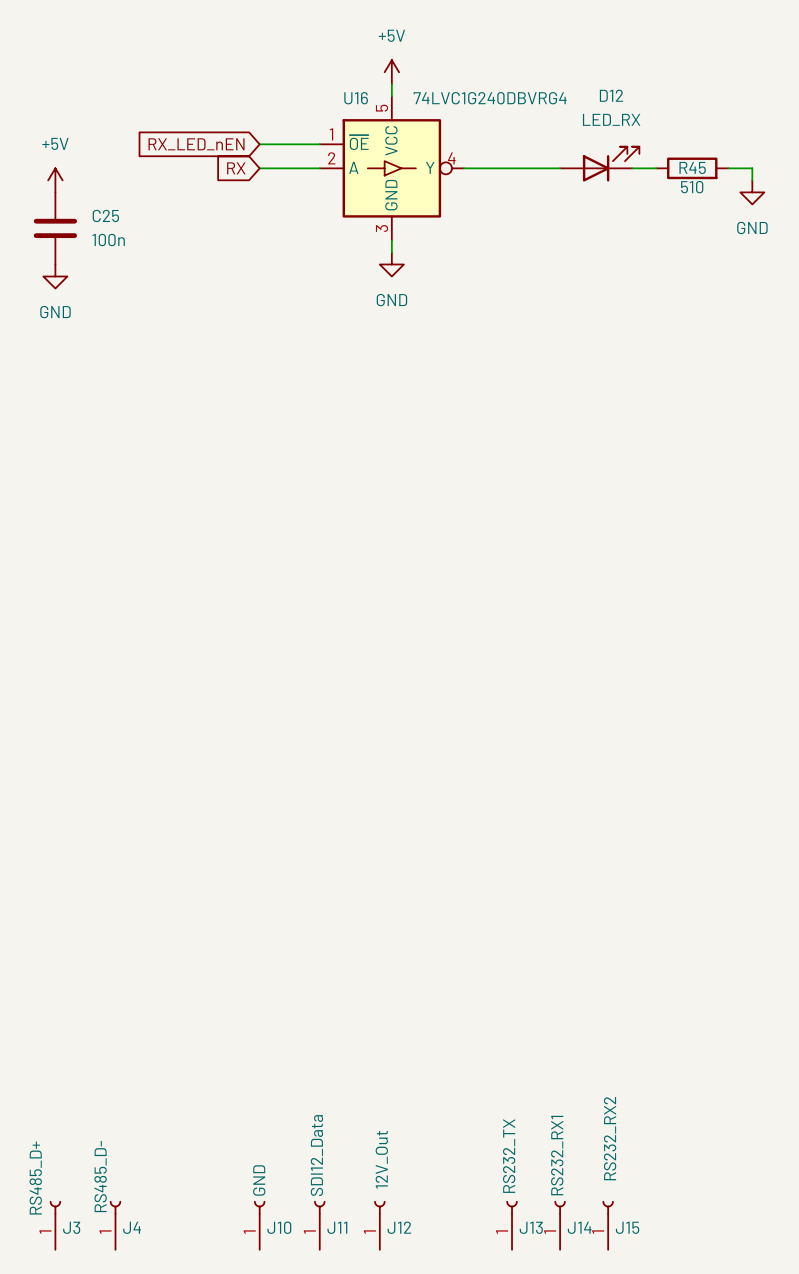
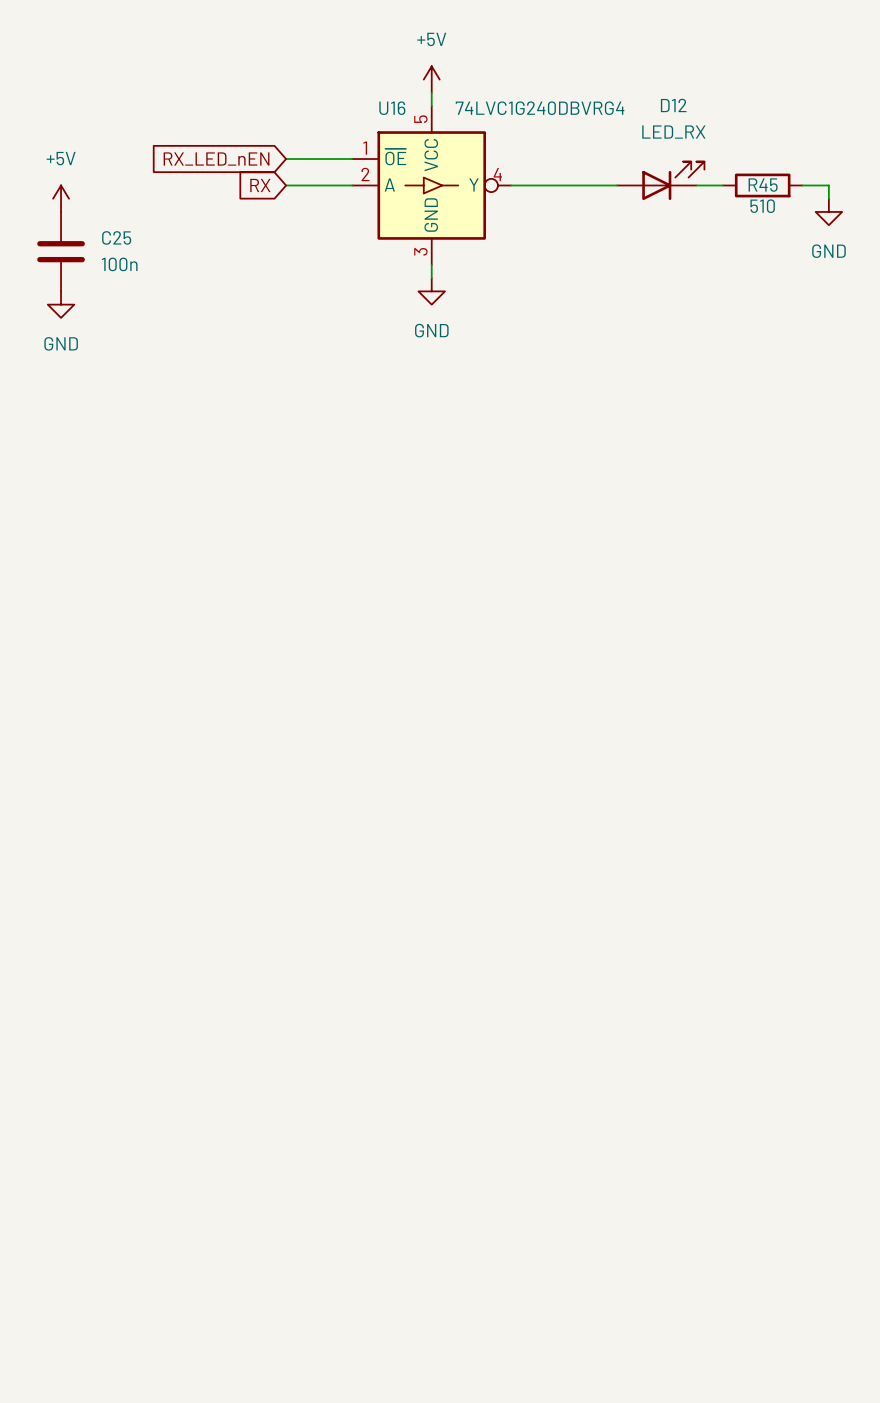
J3: RS485_D+ (55, 1225) -> none
J4: RS485_D- (115, 1225) -> none
J10: GND (259, 1225) -> none
J11: SDI12_Data (319, 1225) -> none
J12: 12V_Out (379, 1225) -> none
J13: RS232_TX (512, 1225) -> none
J14: RS232_RX1 (560, 1225) -> none
J15: RS232_RX2 (608, 1225) -> none

